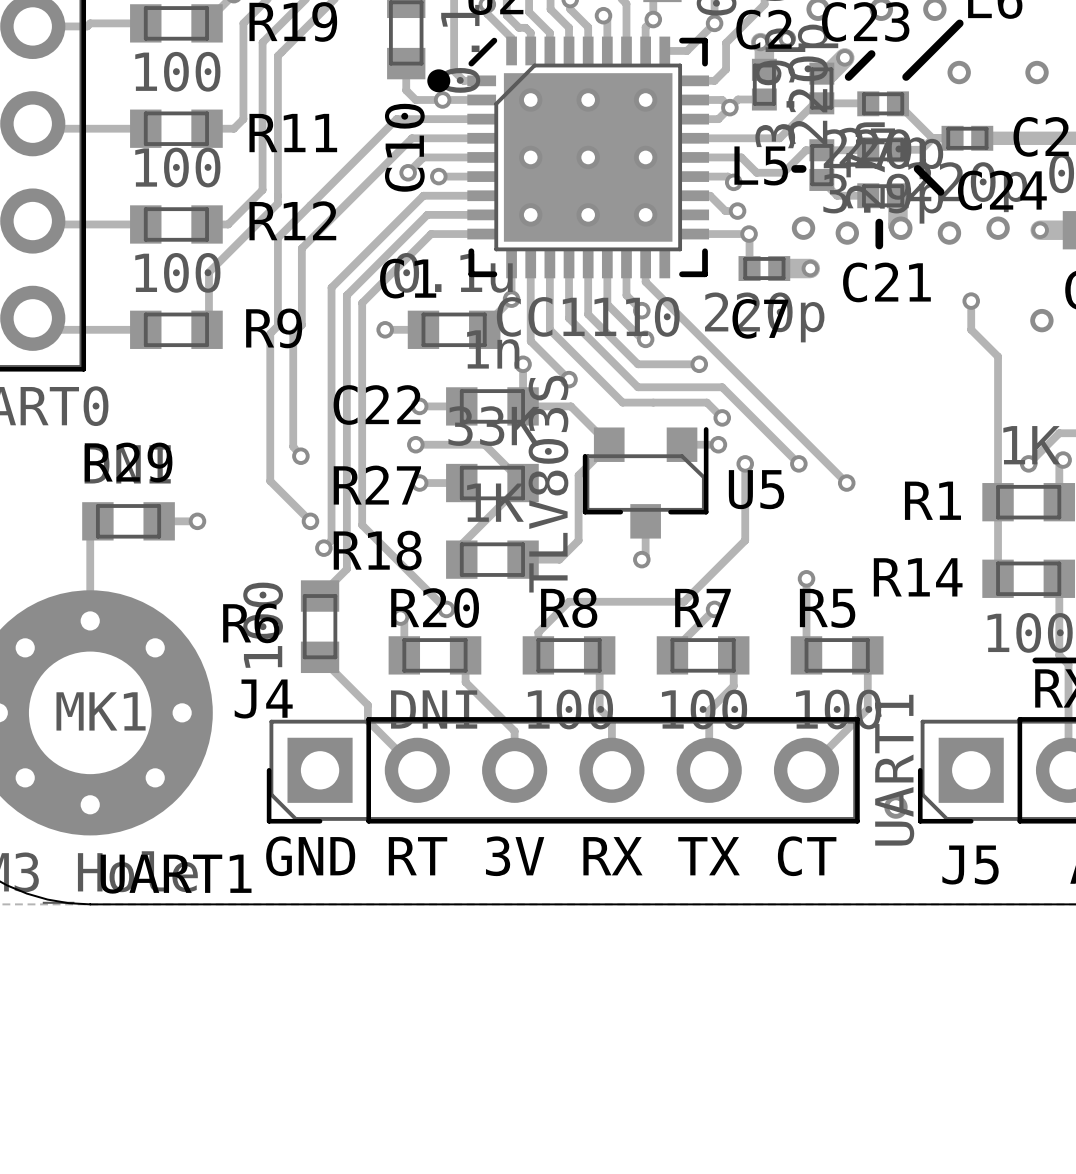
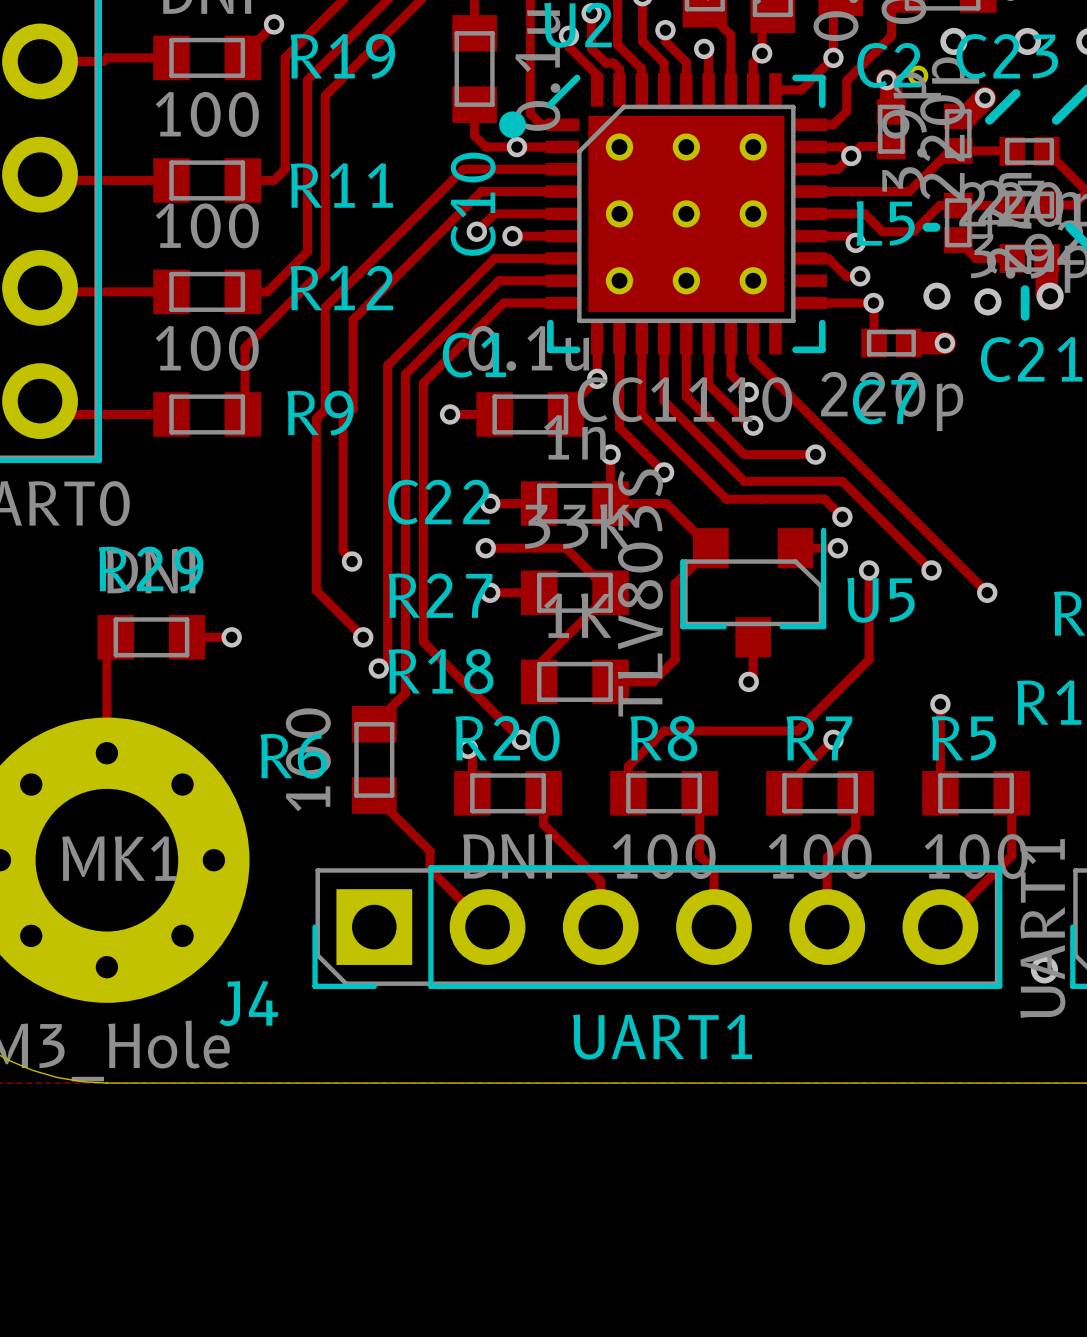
J4 name position: J4 (263, 699) -> J4 (248, 1003)
text: GND (310, 856) -> none
text: RT (418, 856) -> none
text: 3V (515, 856) -> none
text: RX (612, 856) -> UART1 (662, 1037)
text: TX (709, 856) -> none
text: CT (807, 856) -> none
text: UART1 (176, 874) -> none

